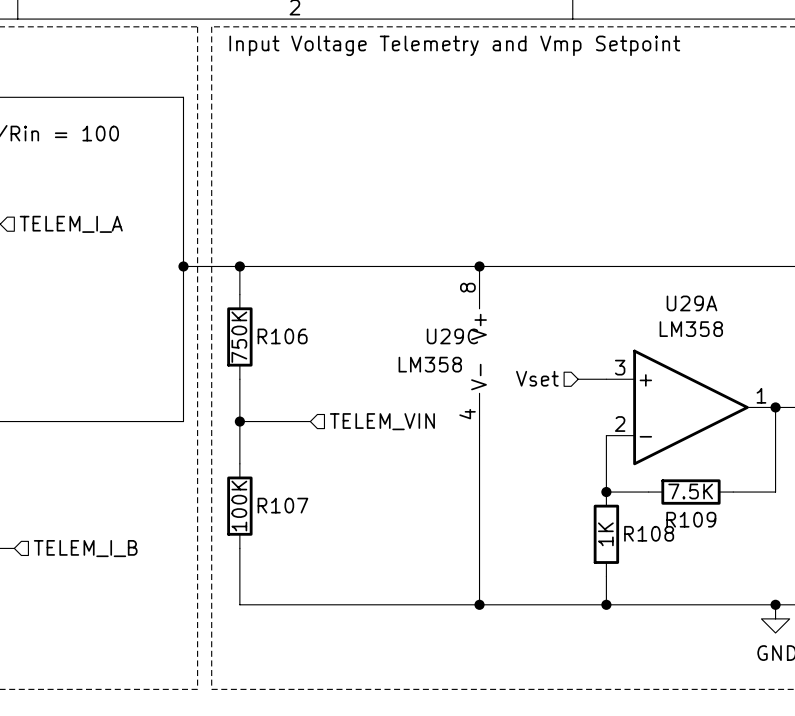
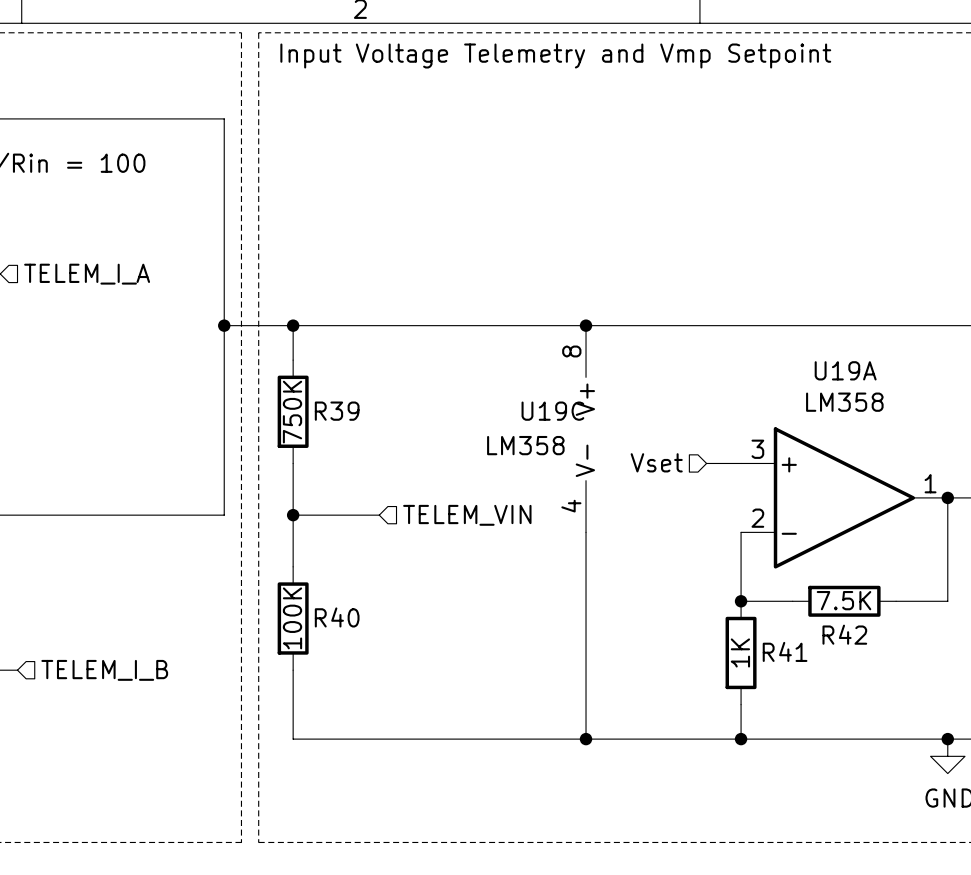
U29A name: U29A (691, 303) -> U19A (845, 370)
R106 name: R106 (282, 336) -> R39 (337, 411)
U29C name: U29C (452, 336) -> U19C (552, 411)
R107 name: R107 (282, 505) -> R40 (337, 617)
R109 name: R109 (691, 519) -> R42 (844, 634)
R108 name: R108 (649, 533) -> R41 (785, 651)

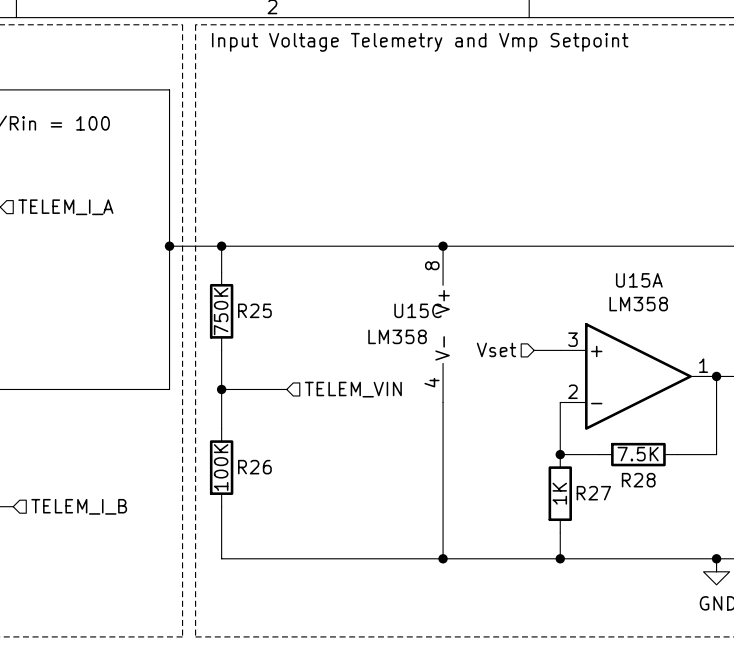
U19A name: U19A (845, 370) -> U15A (639, 280)
R39 name: R39 (337, 411) -> R25 (254, 310)
U19C name: U19C (552, 411) -> U15C (418, 310)
R40 name: R40 (337, 617) -> R26 (254, 467)
R42 name: R42 (844, 634) -> R28 (638, 480)
R41 name: R41 (785, 651) -> R27 (593, 493)

